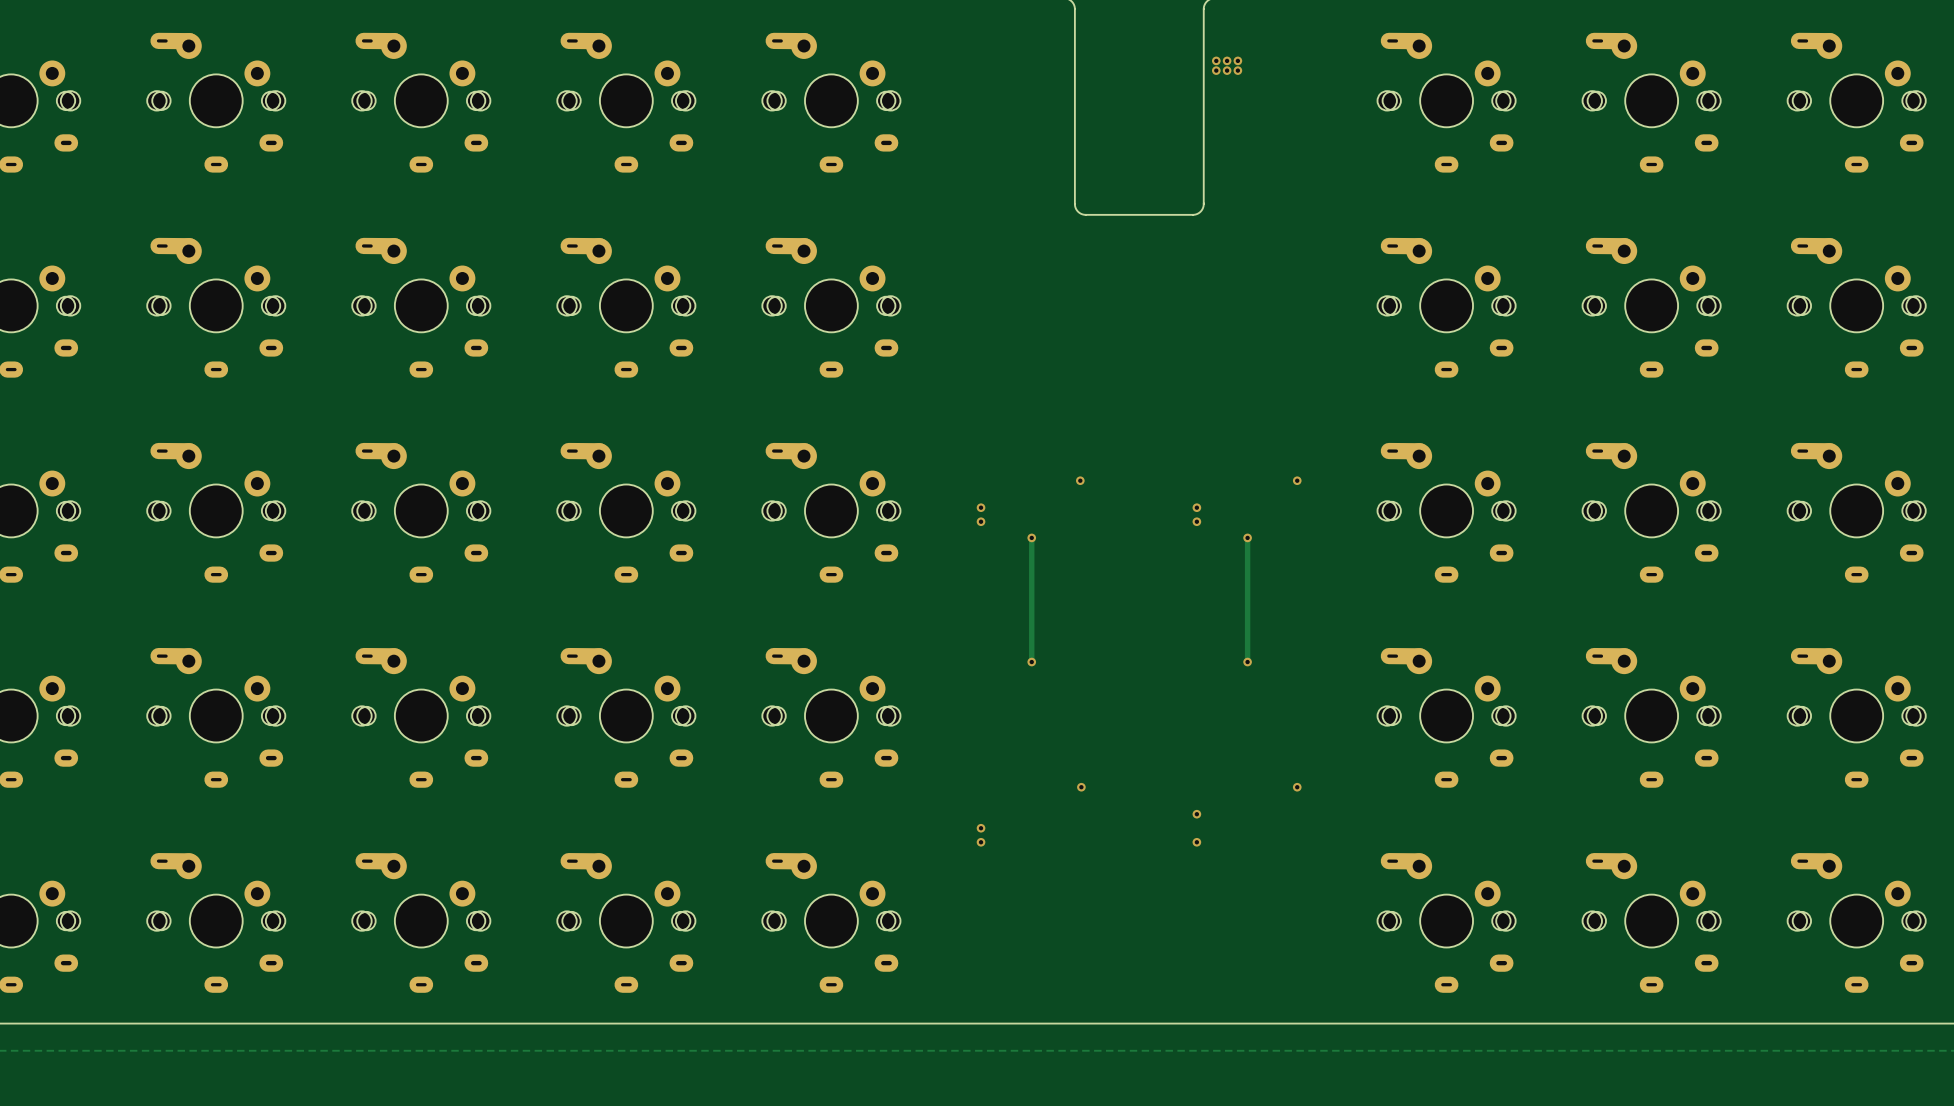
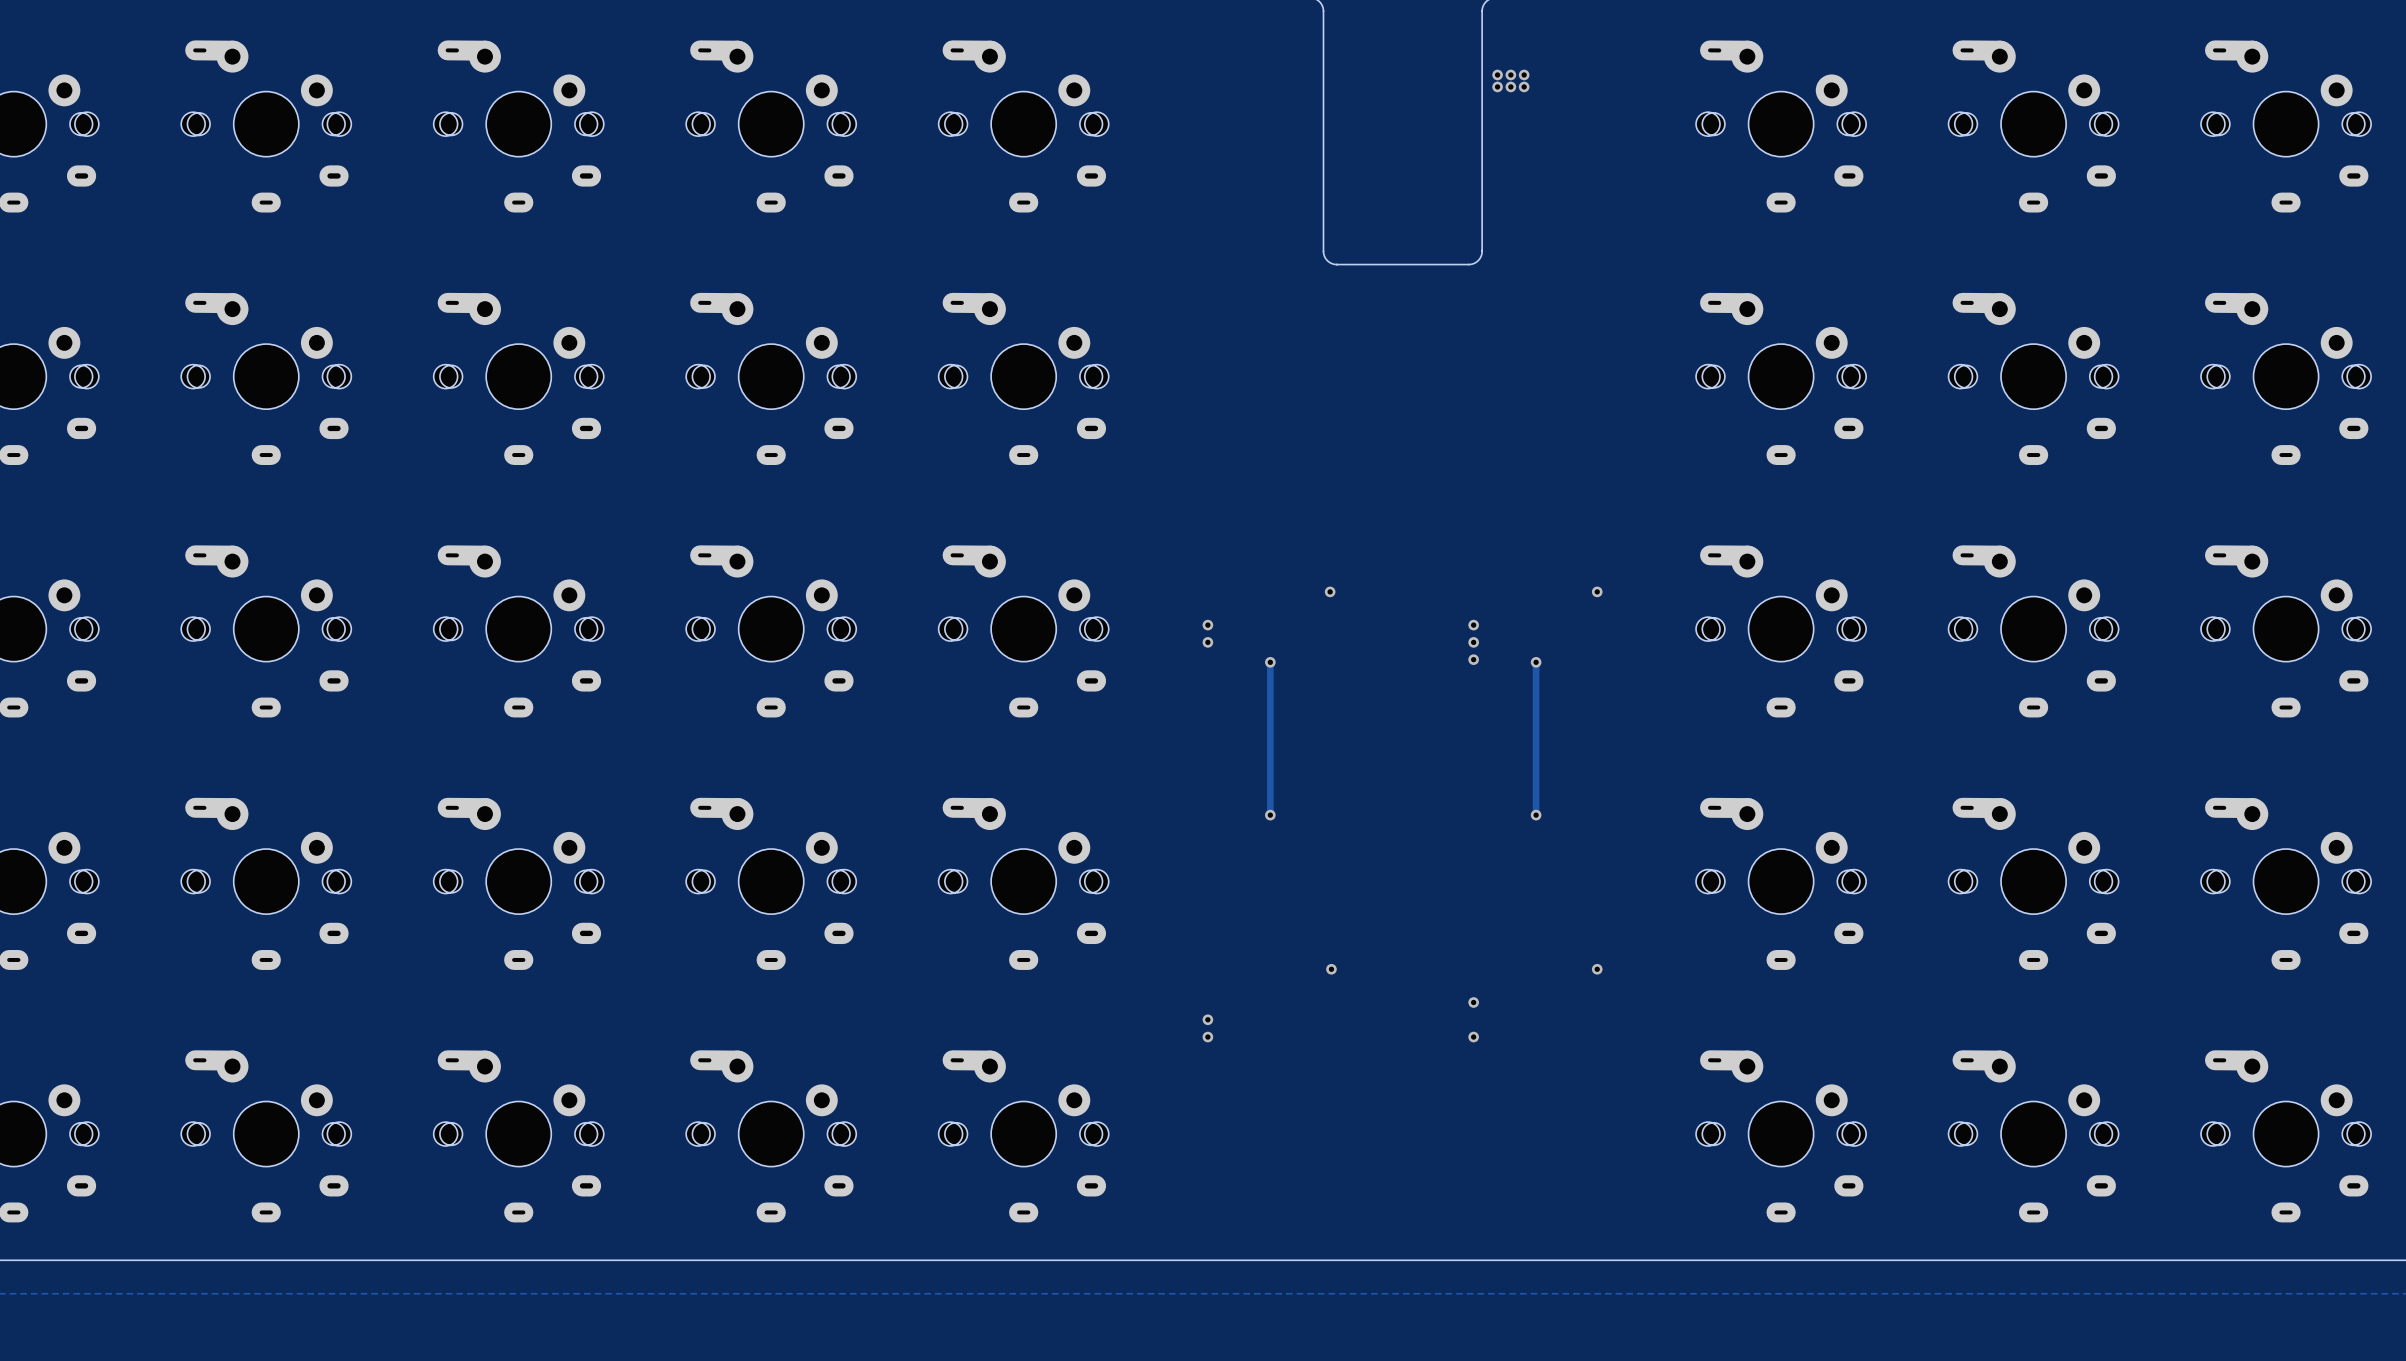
via: none -> (1473, 659)

